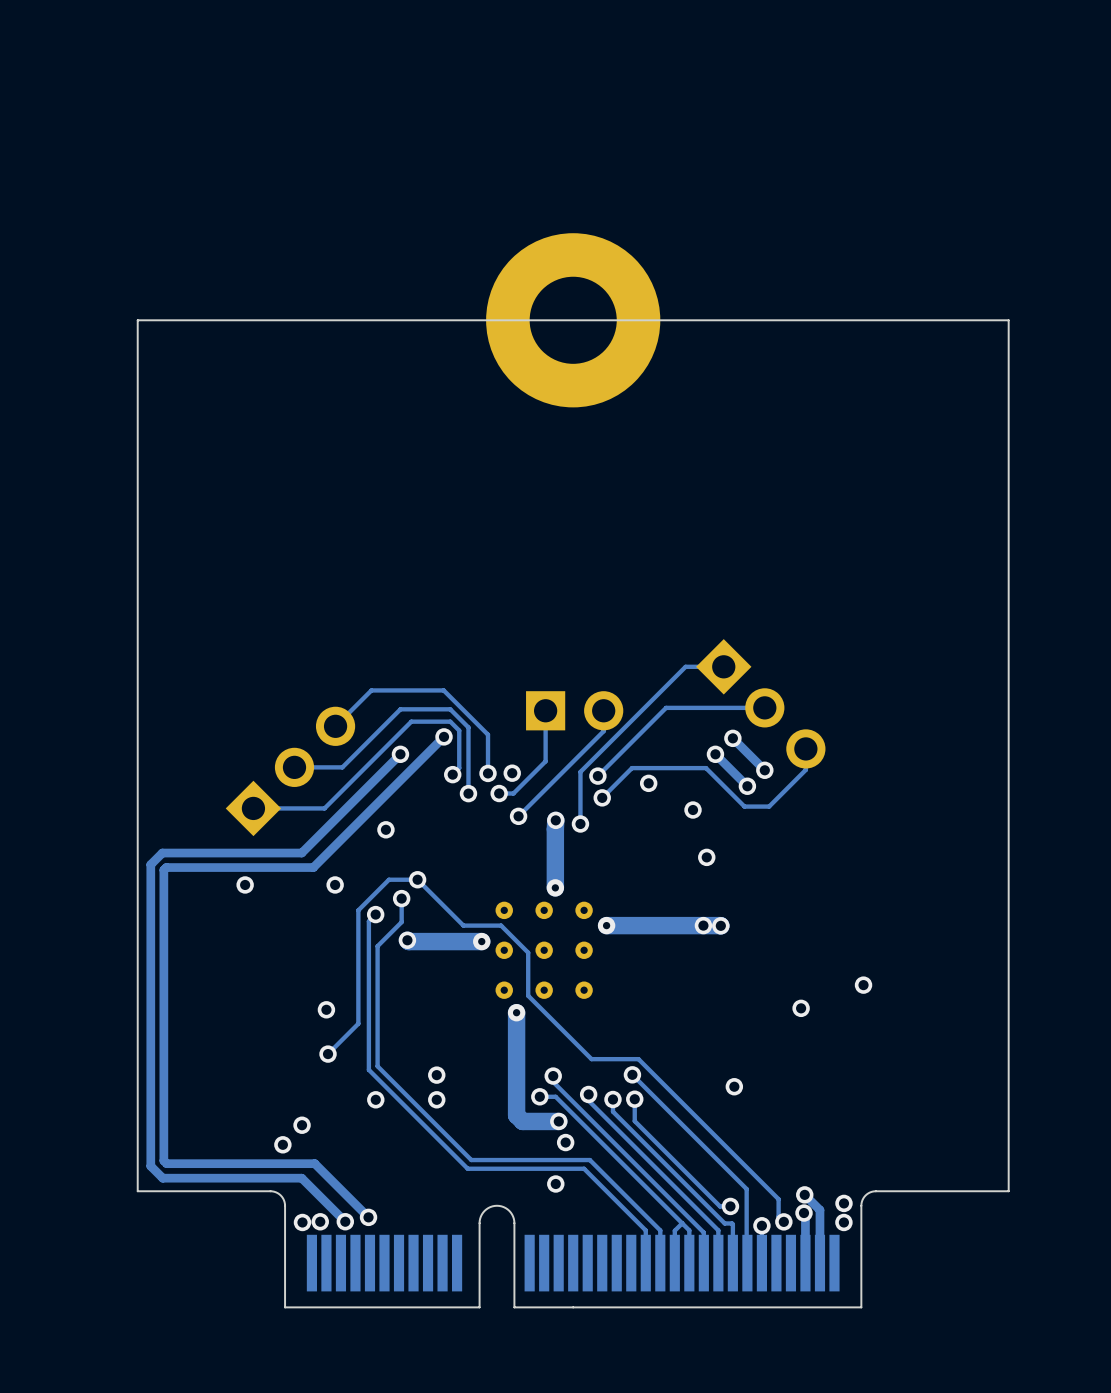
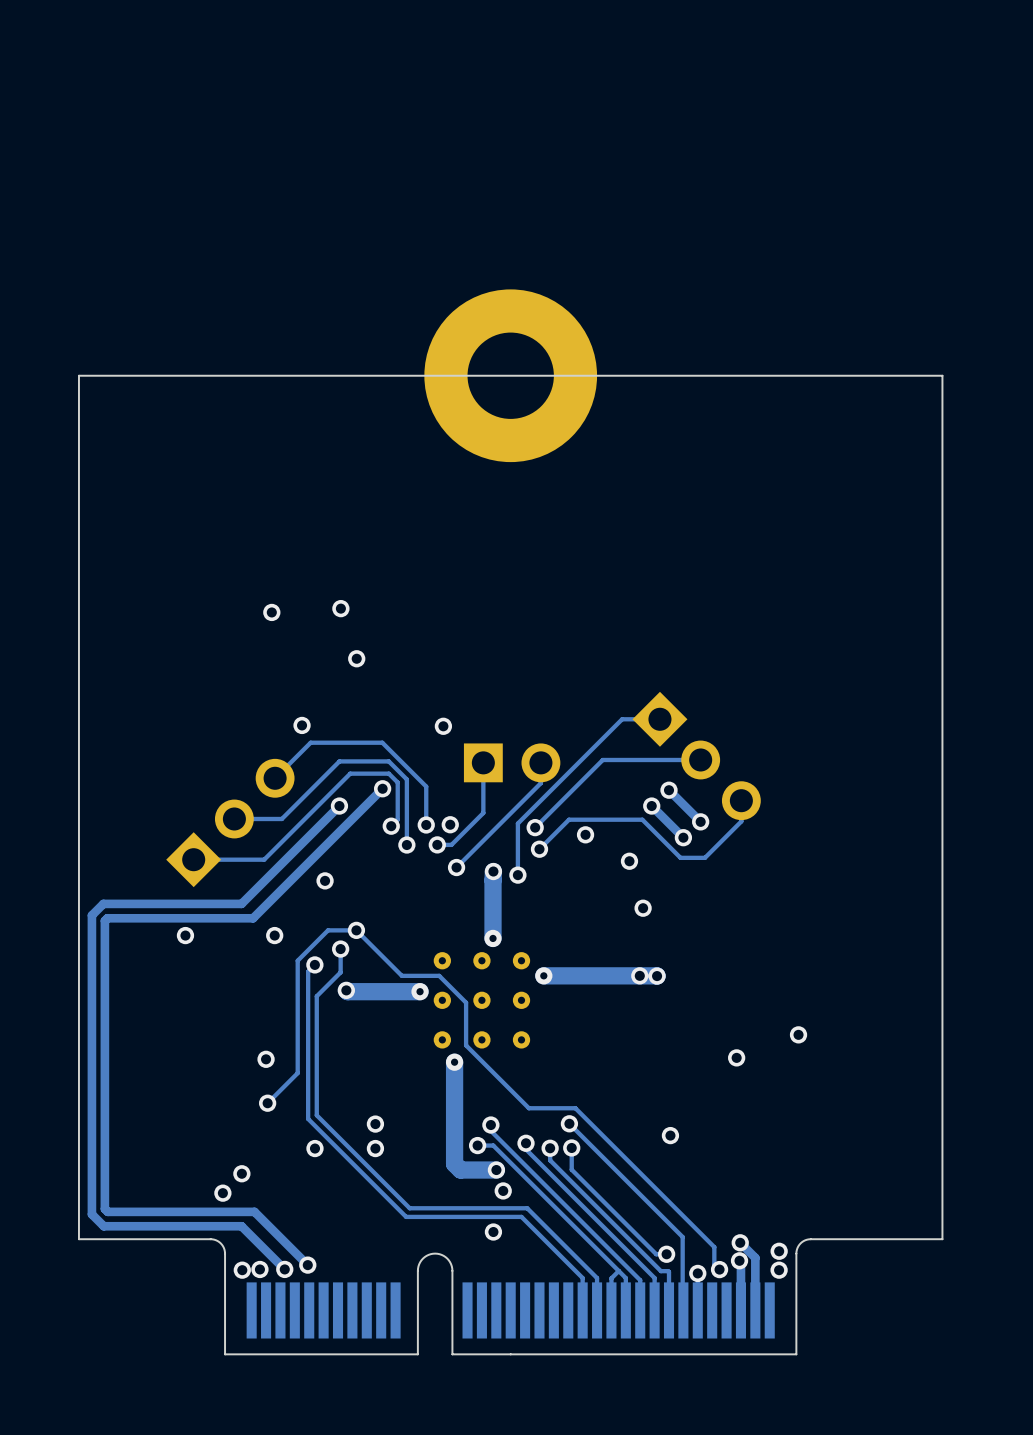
via: none -> (340, 608)
via: none -> (271, 612)
via: none -> (356, 658)
via: none -> (302, 725)
via: none -> (443, 726)

